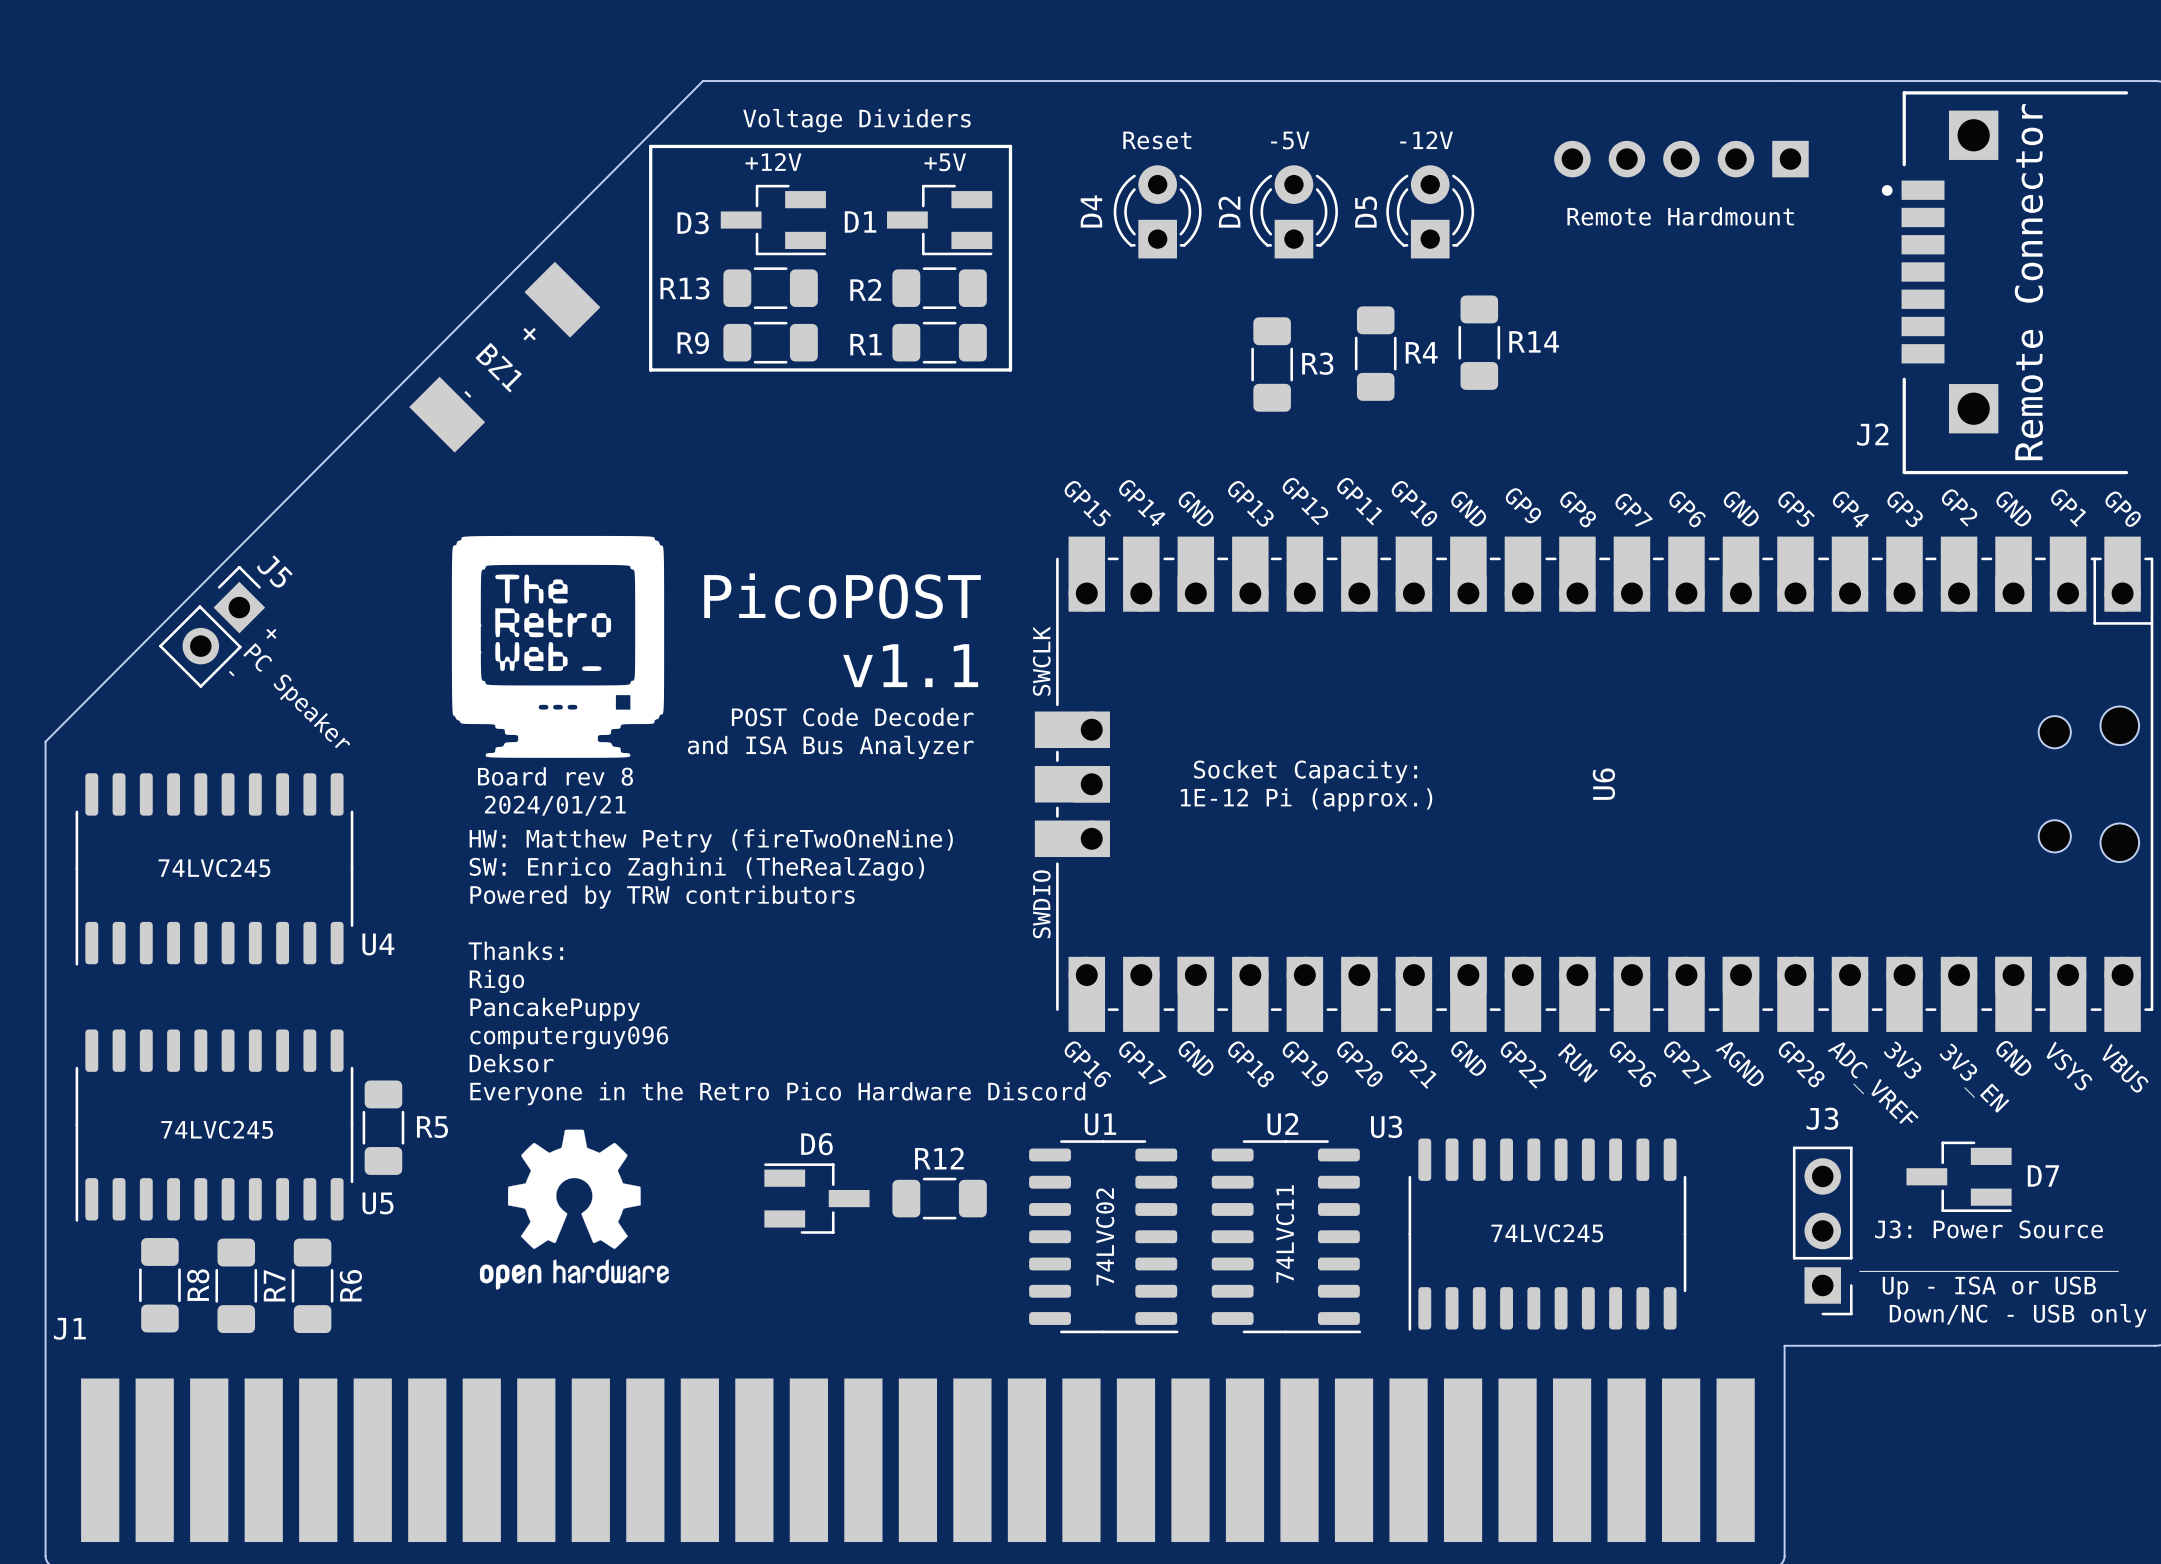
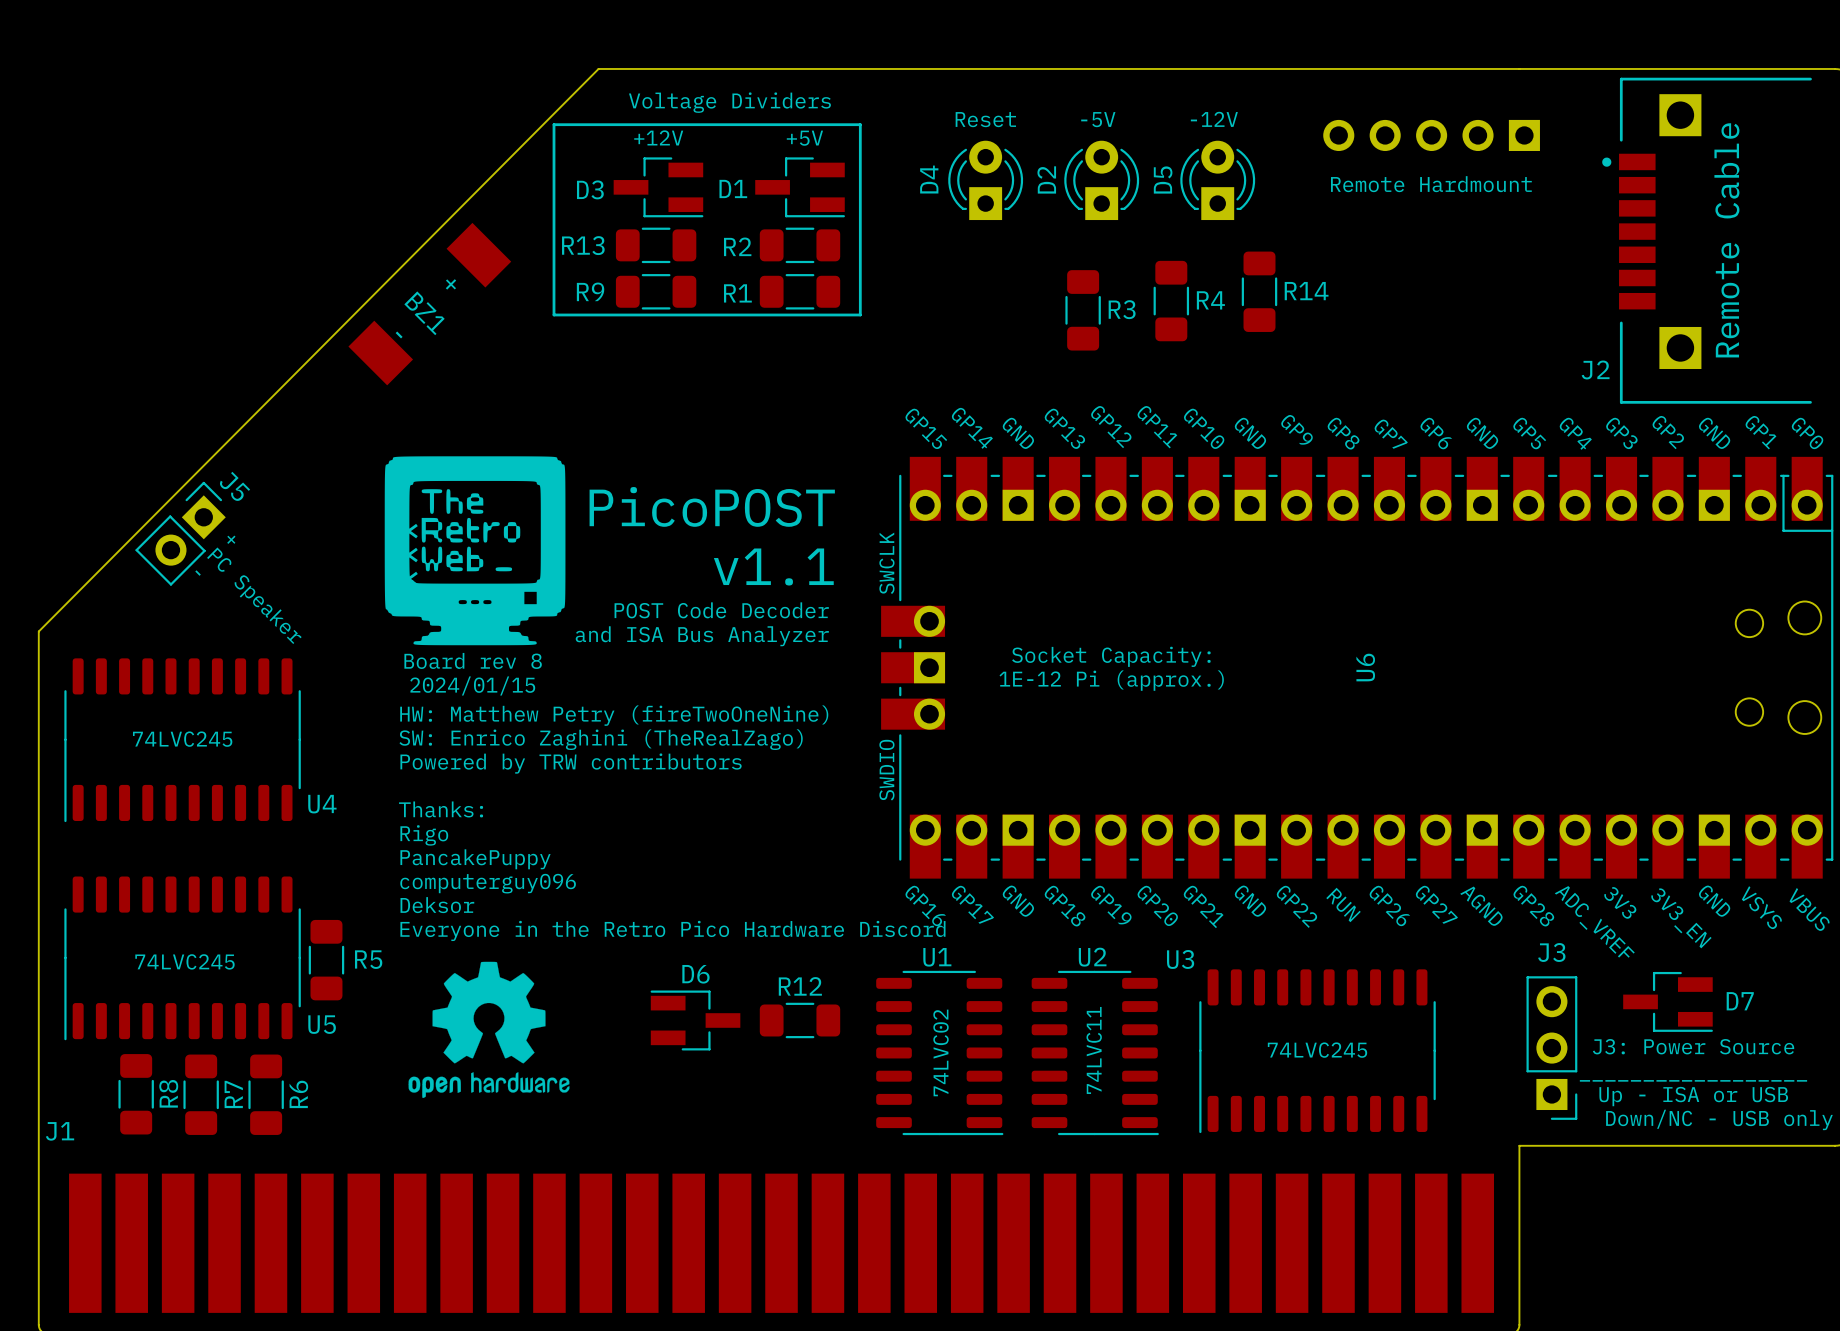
J2 value: Remote Connector (2028, 282) -> Remote Cable (1726, 240)
text: 2024/01/21 (555, 805) -> 2024/01/15 (472, 685)

